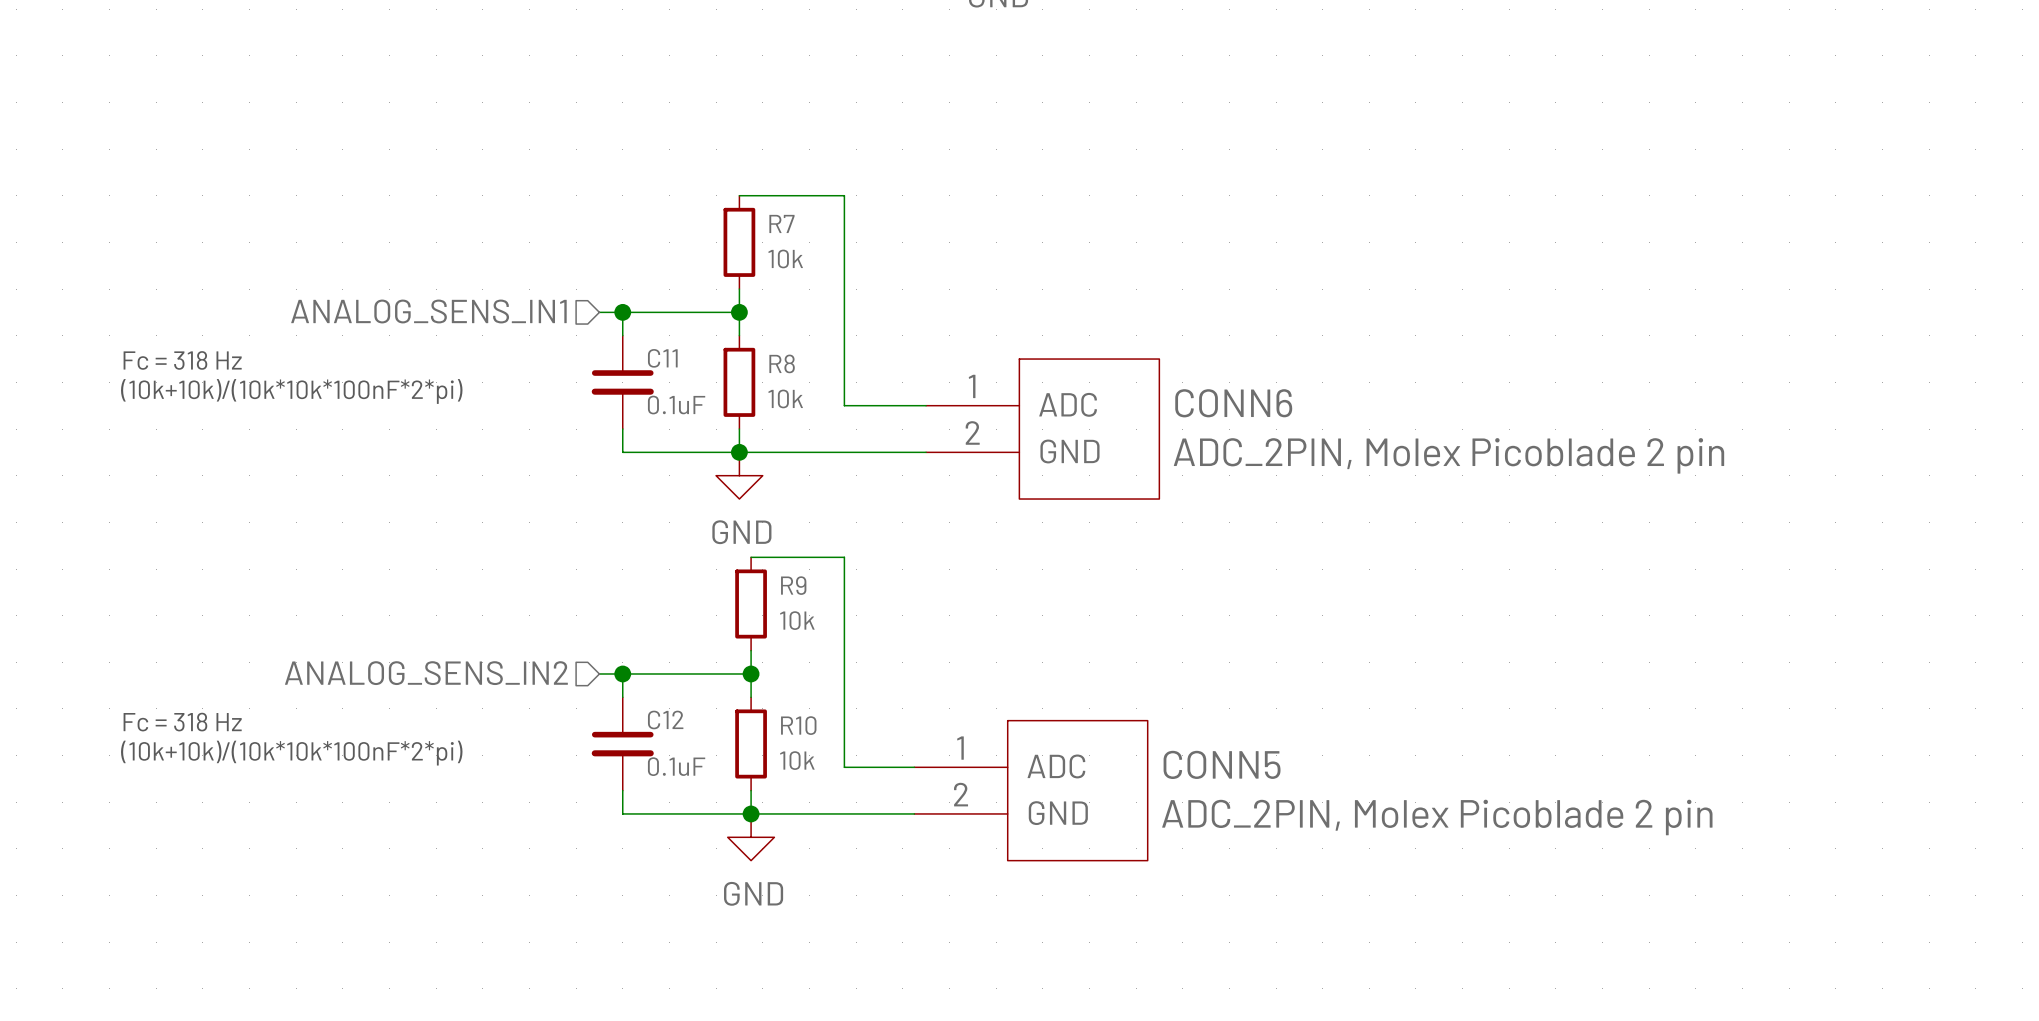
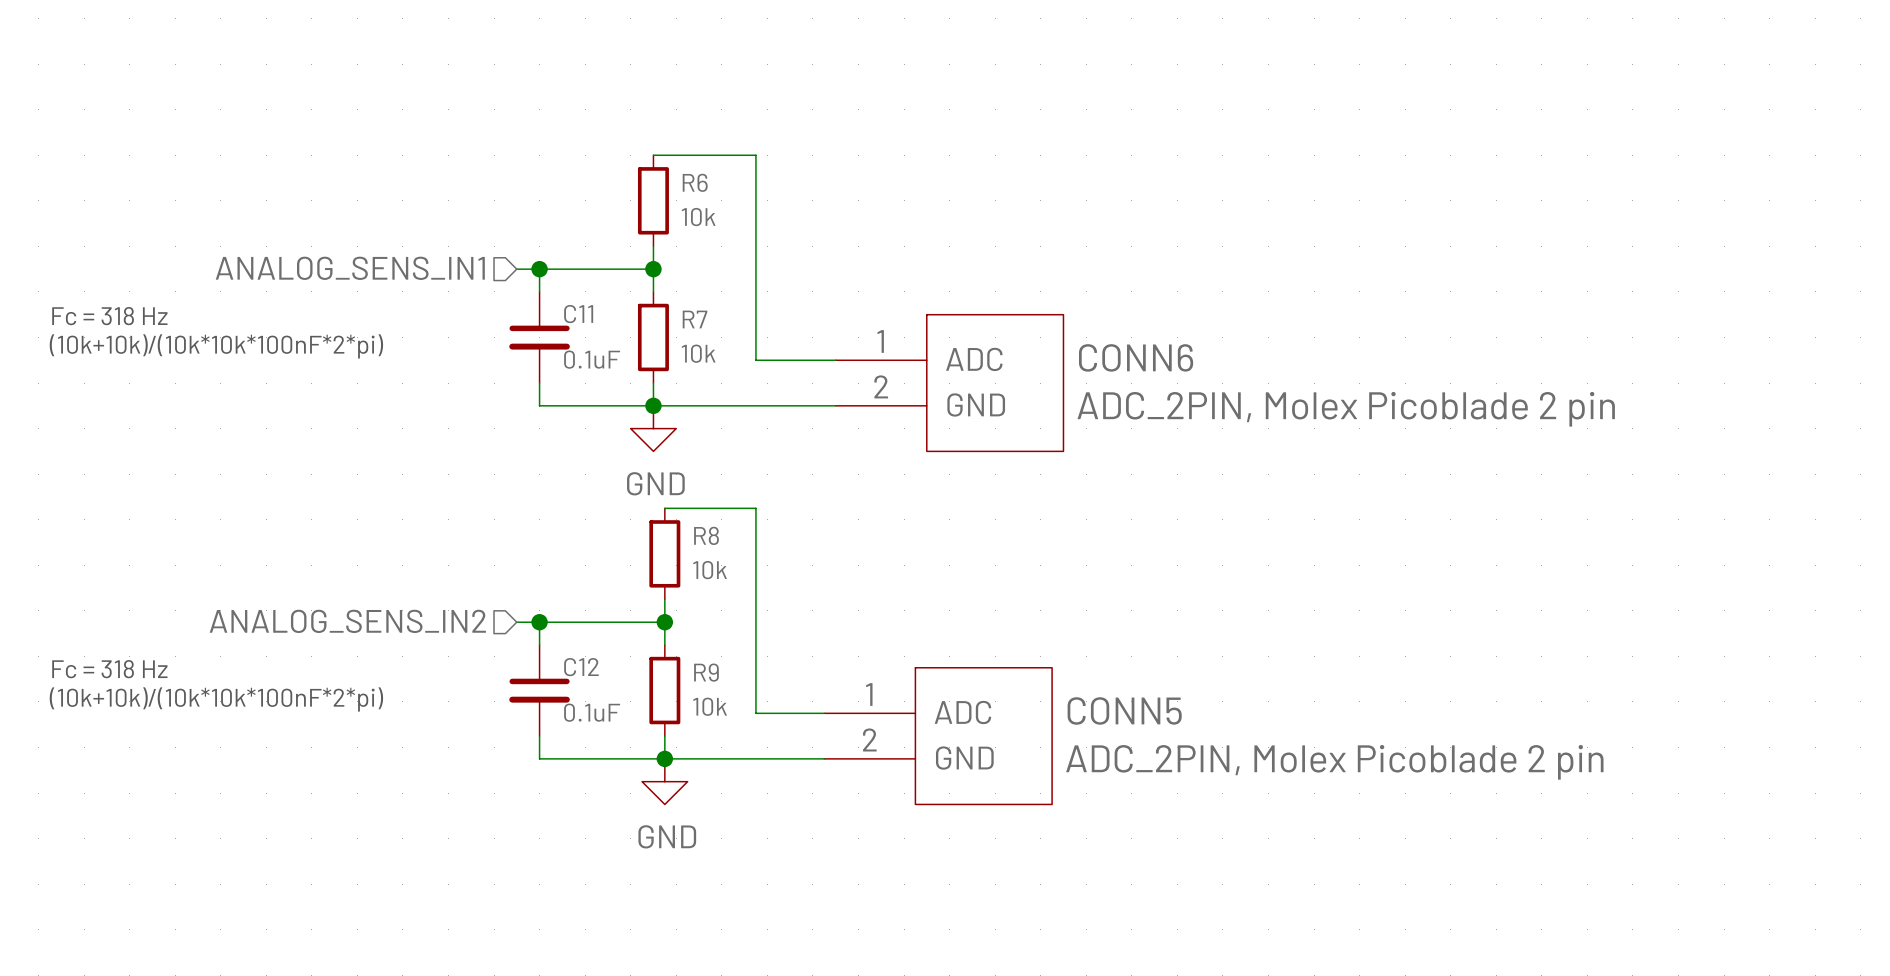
R7 name: R7 (781, 223) -> R6 (695, 182)
R8 name: R8 (782, 363) -> R7 (695, 319)
R9 name: R9 (793, 585) -> R8 (706, 535)
R10 name: R10 (798, 725) -> R9 (706, 672)

